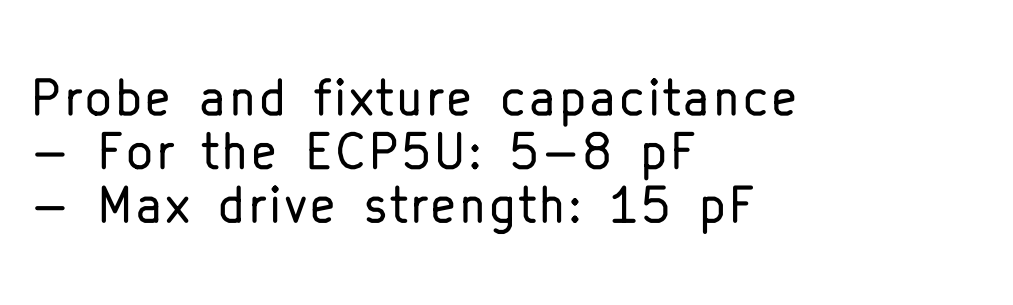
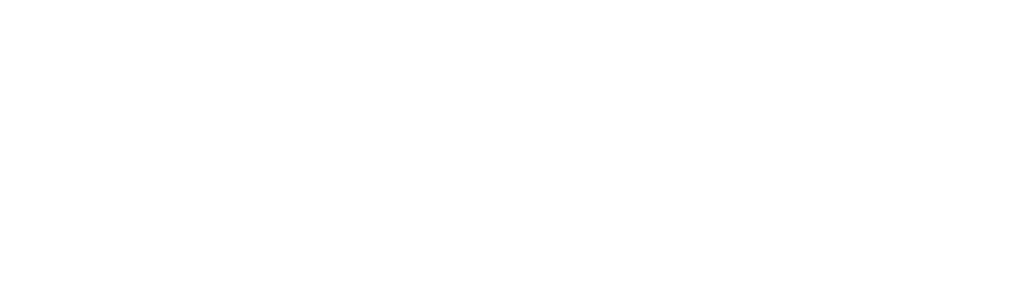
text: Probe and fixture capacitance (414, 102) -> none
text: - For the ECP5U: 5-8 pF (364, 156) -> none
text: - Max drive strength: 15 pF (394, 209) -> none

